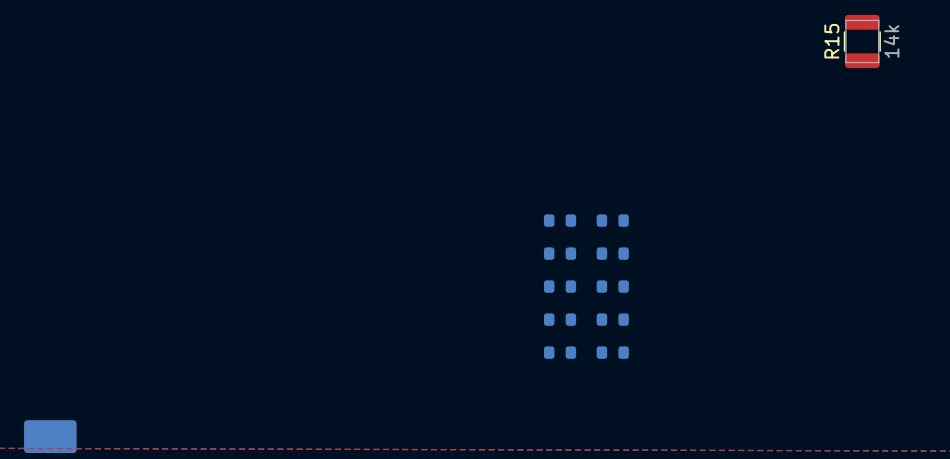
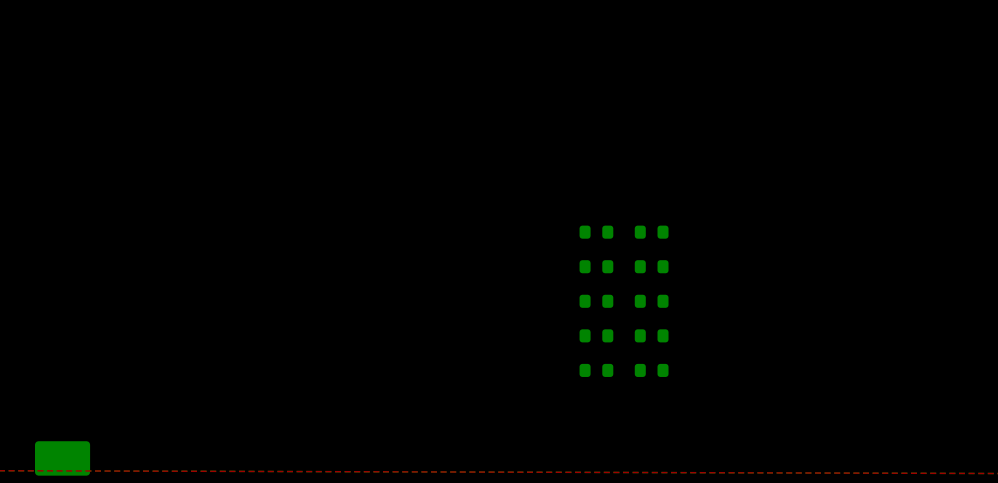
R15: 14k (862, 41) -> none

